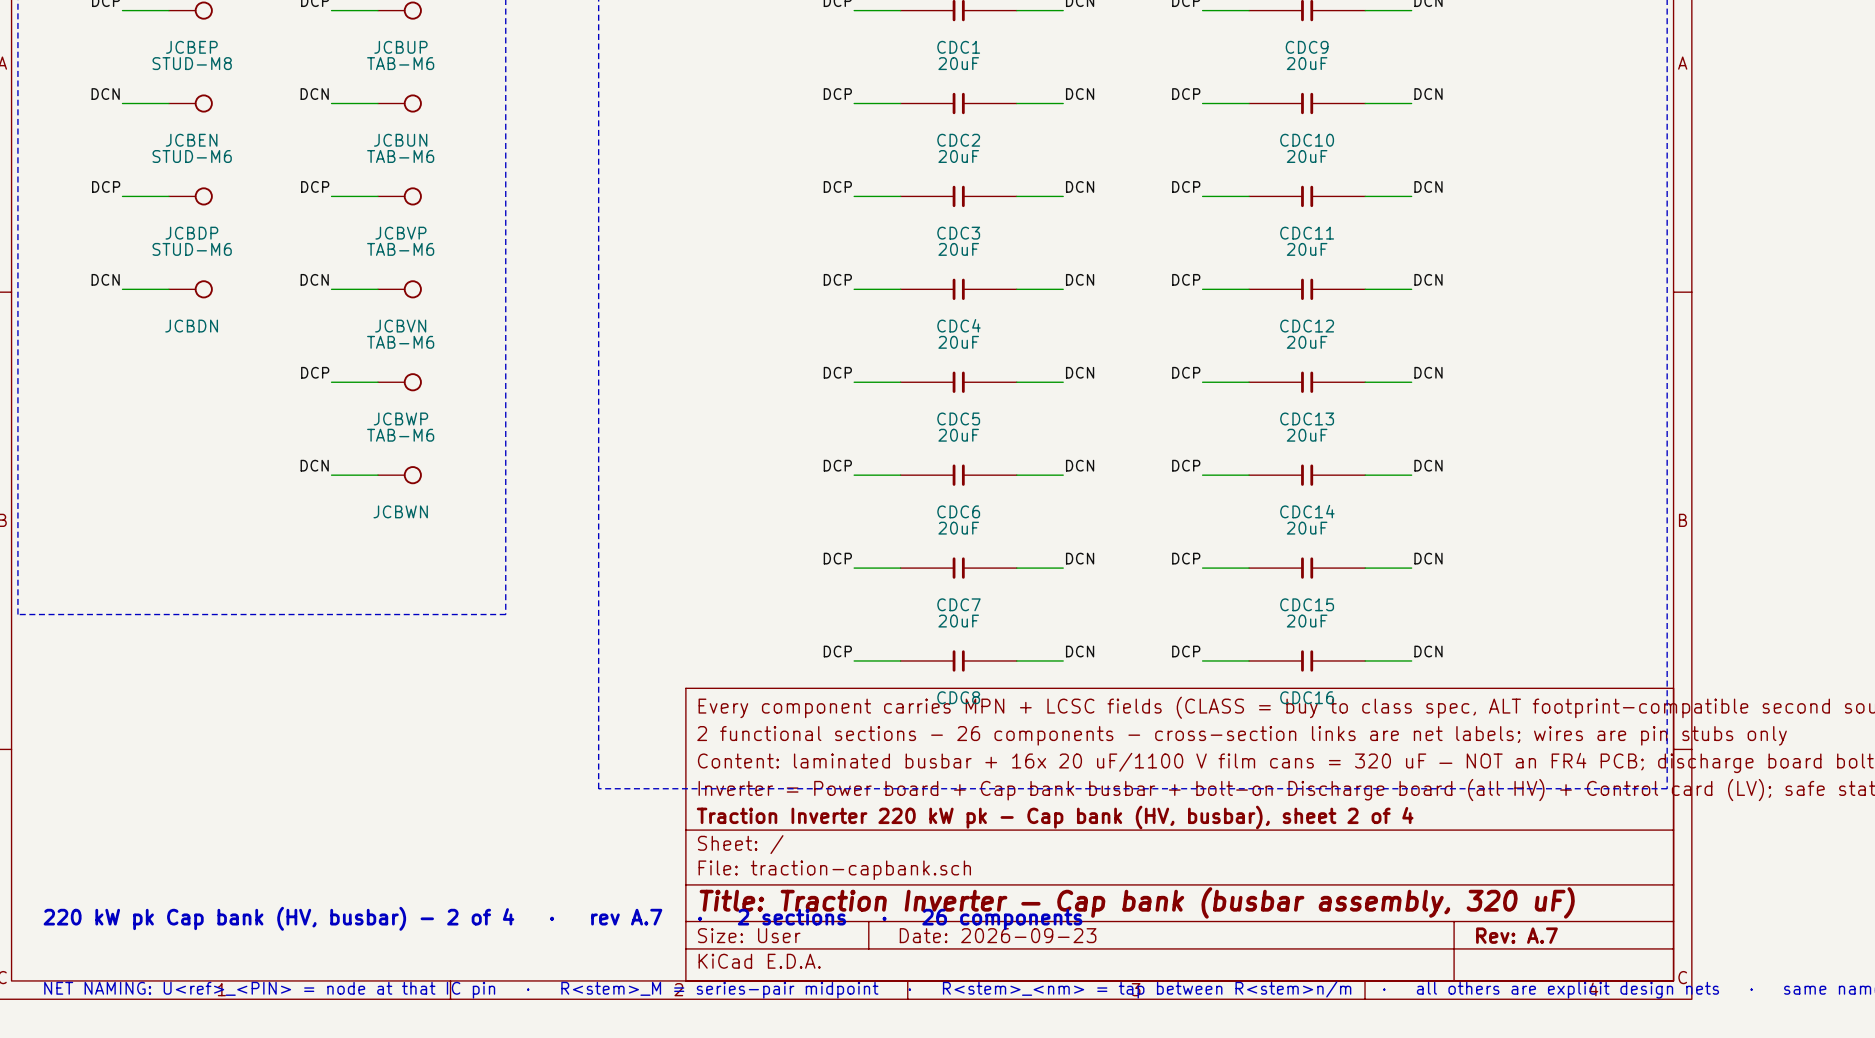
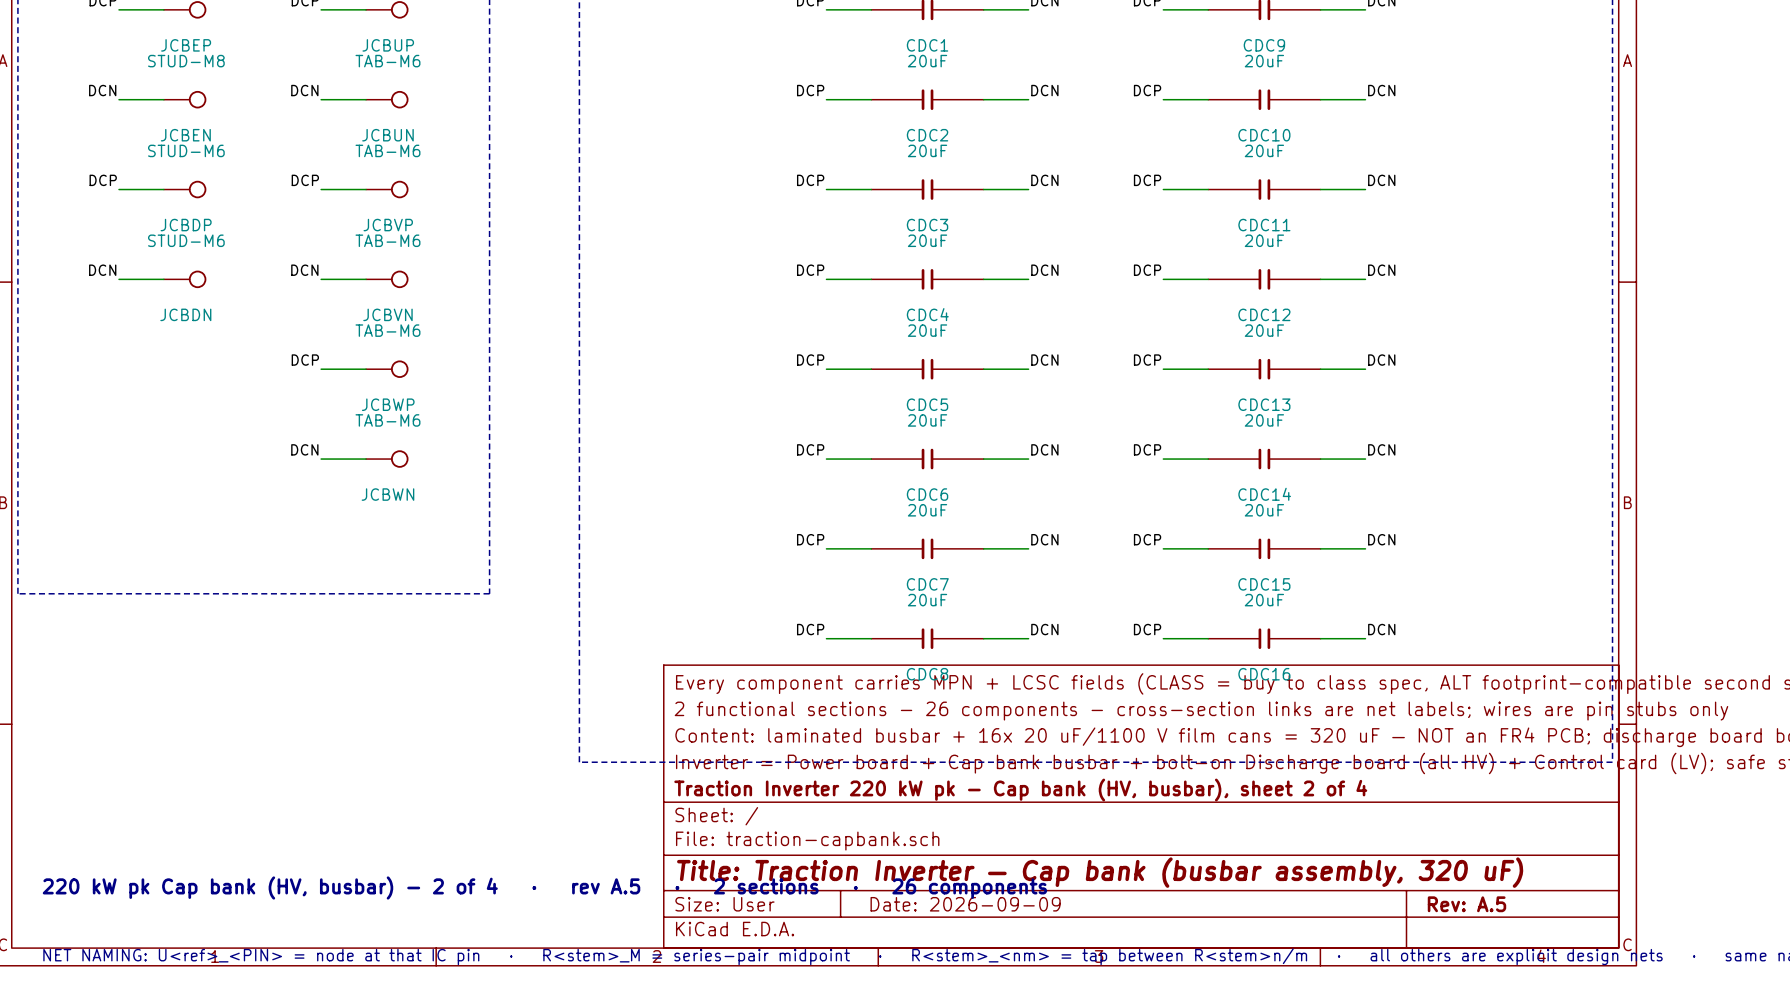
text: 220 kW pk Cap bank (HV, busbar) - 2 of 4 · rev A.7 · 2 sections · 26 components (563, 918) -> 220 kW pk Cap bank (HV, busbar) - 2 of 4 · rev A.5 · 2 sections · 26 components (544, 887)
title block: Date: 2026-09-23 (998, 935) -> Date: 2026-09-09 (965, 904)
title block: Rev: A.7 (1516, 935) -> Rev: A.5 (1466, 904)

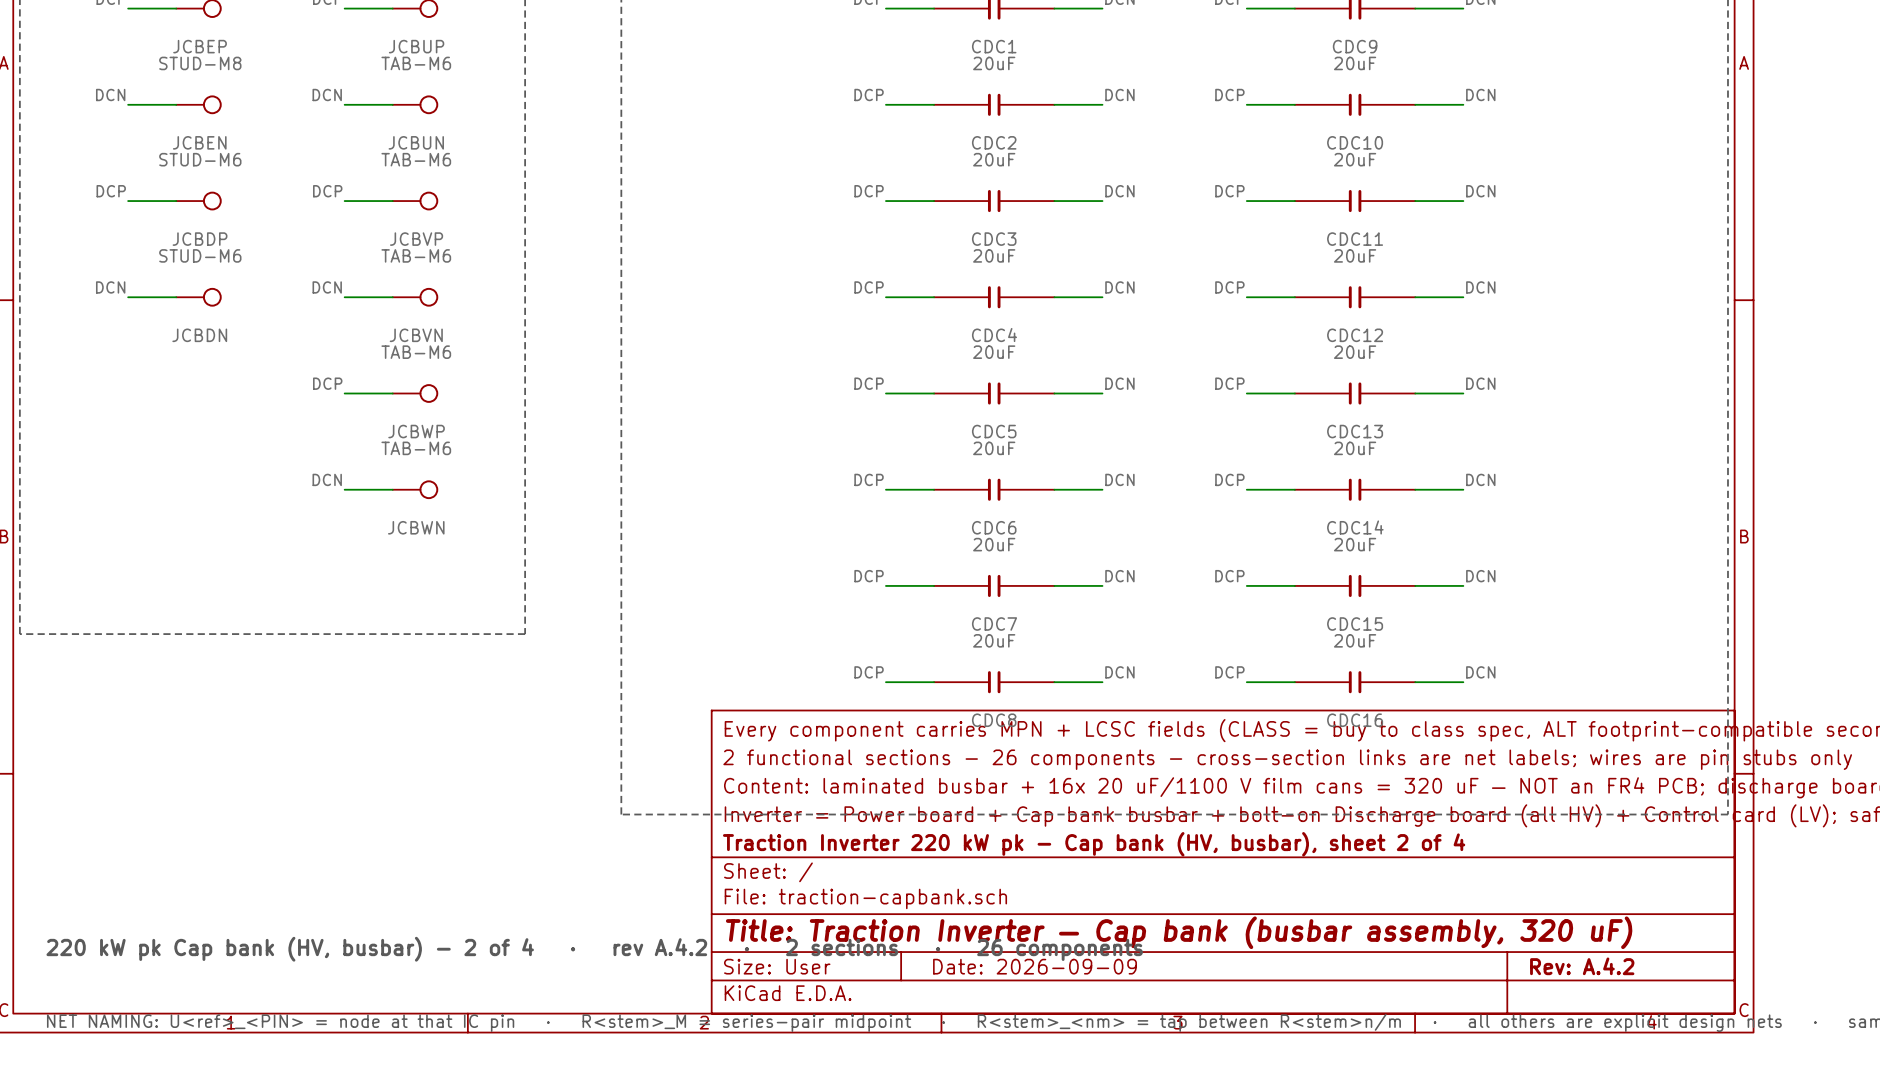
text: 220 kW pk Cap bank (HV, busbar) - 2 of 4 · rev A.5 · 2 sections · 26 components (544, 887) -> 220 kW pk Cap bank (HV, busbar) - 2 of 4 · rev A.4.2 · 2 sections · 26 components (594, 949)
title block: Rev: A.5 (1466, 904) -> Rev: A.4.2 (1582, 966)

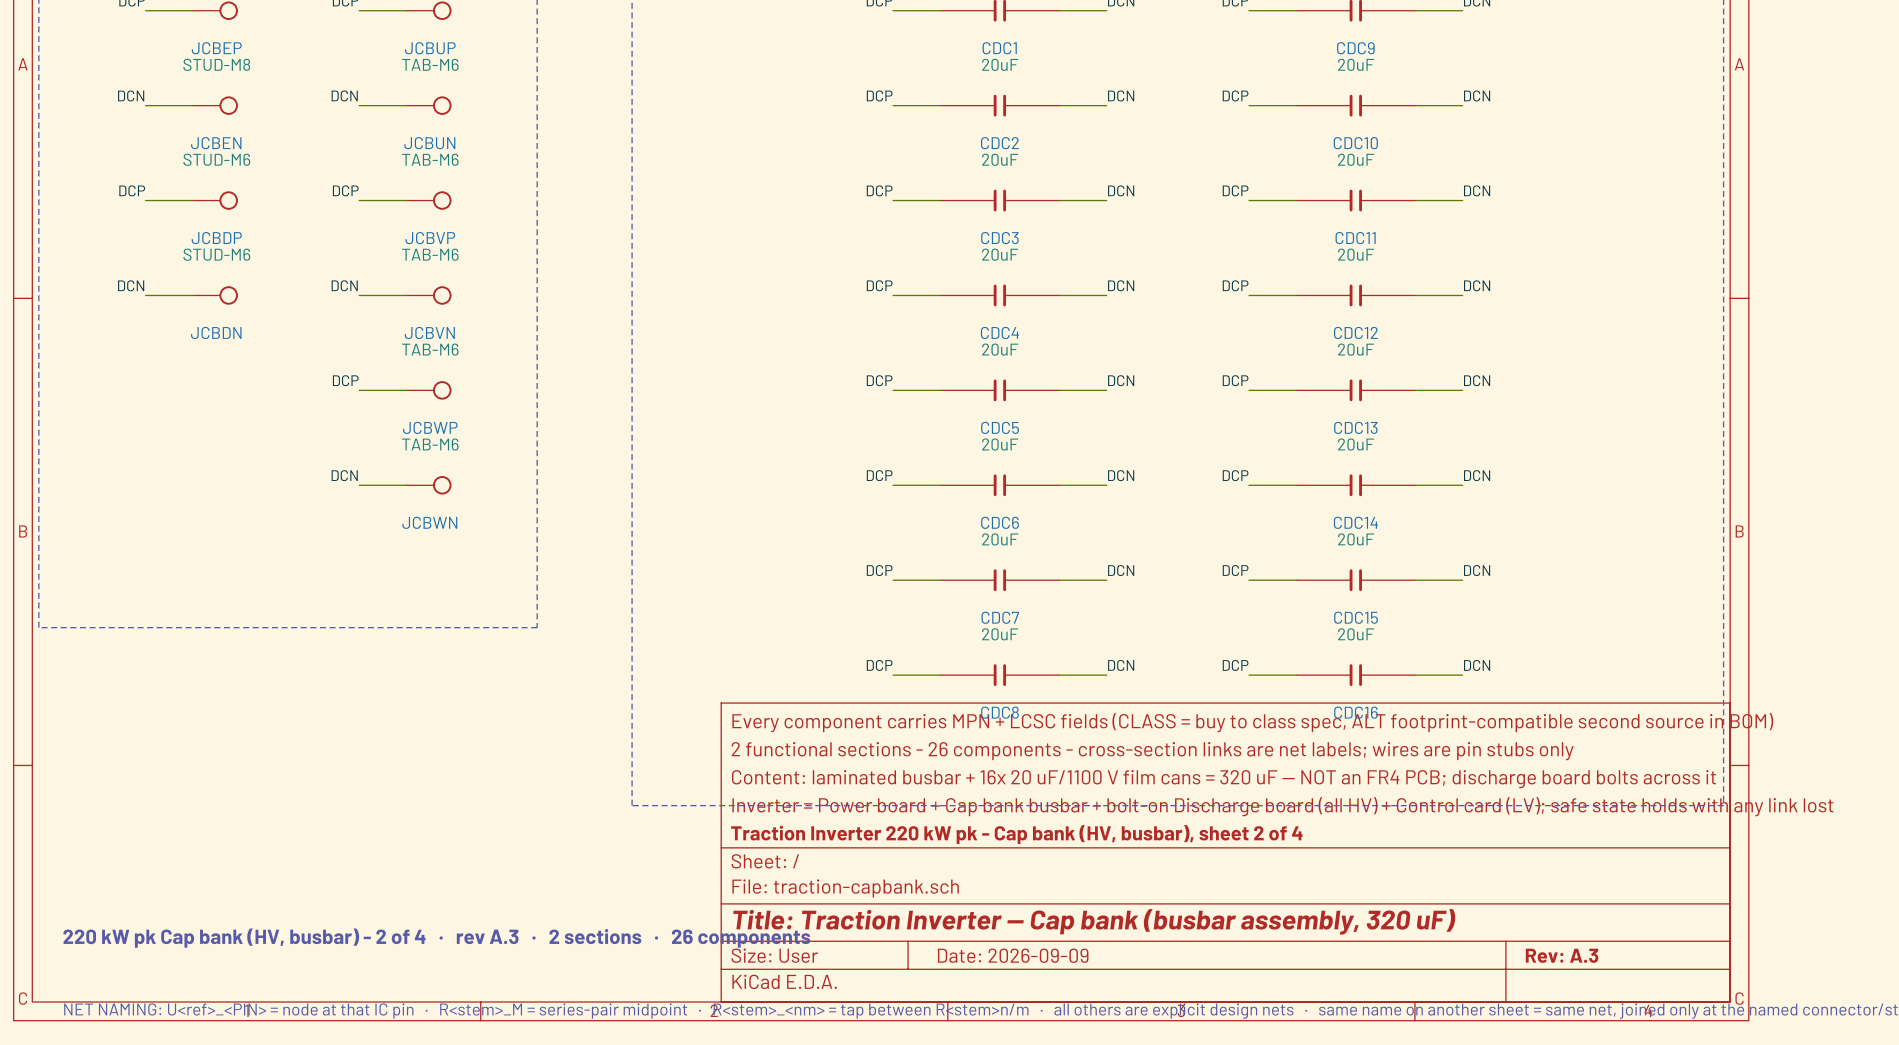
text: 220 kW pk Cap bank (HV, busbar) - 2 of 4 · rev A.4.2 · 2 sections · 26 components (594, 949) -> 220 kW pk Cap bank (HV, busbar) - 2 of 4 · rev A.3 · 2 sections · 26 components (436, 938)
title block: Rev: A.4.2 (1582, 966) -> Rev: A.3 (1562, 955)

